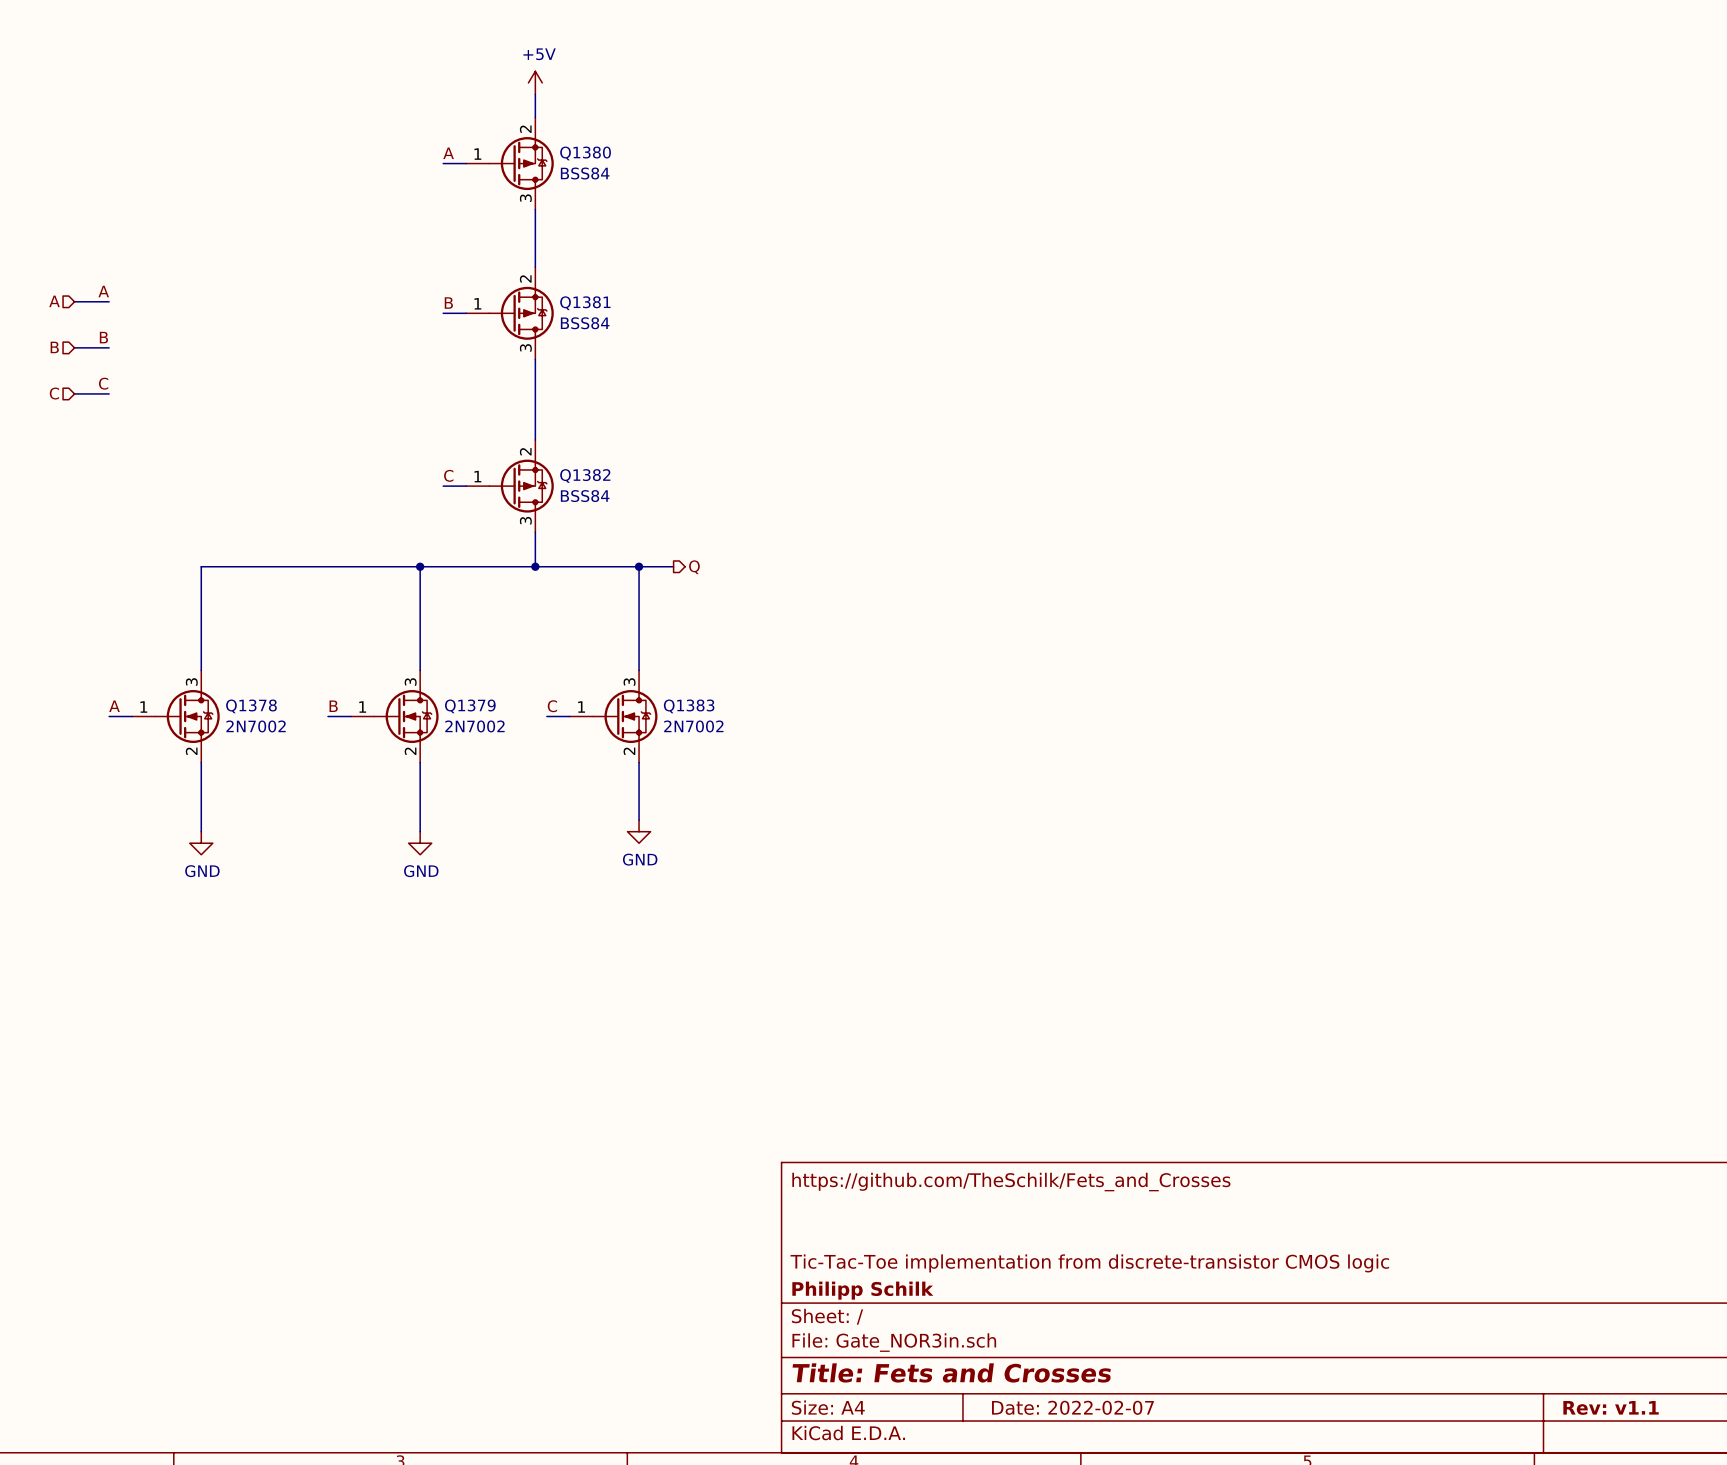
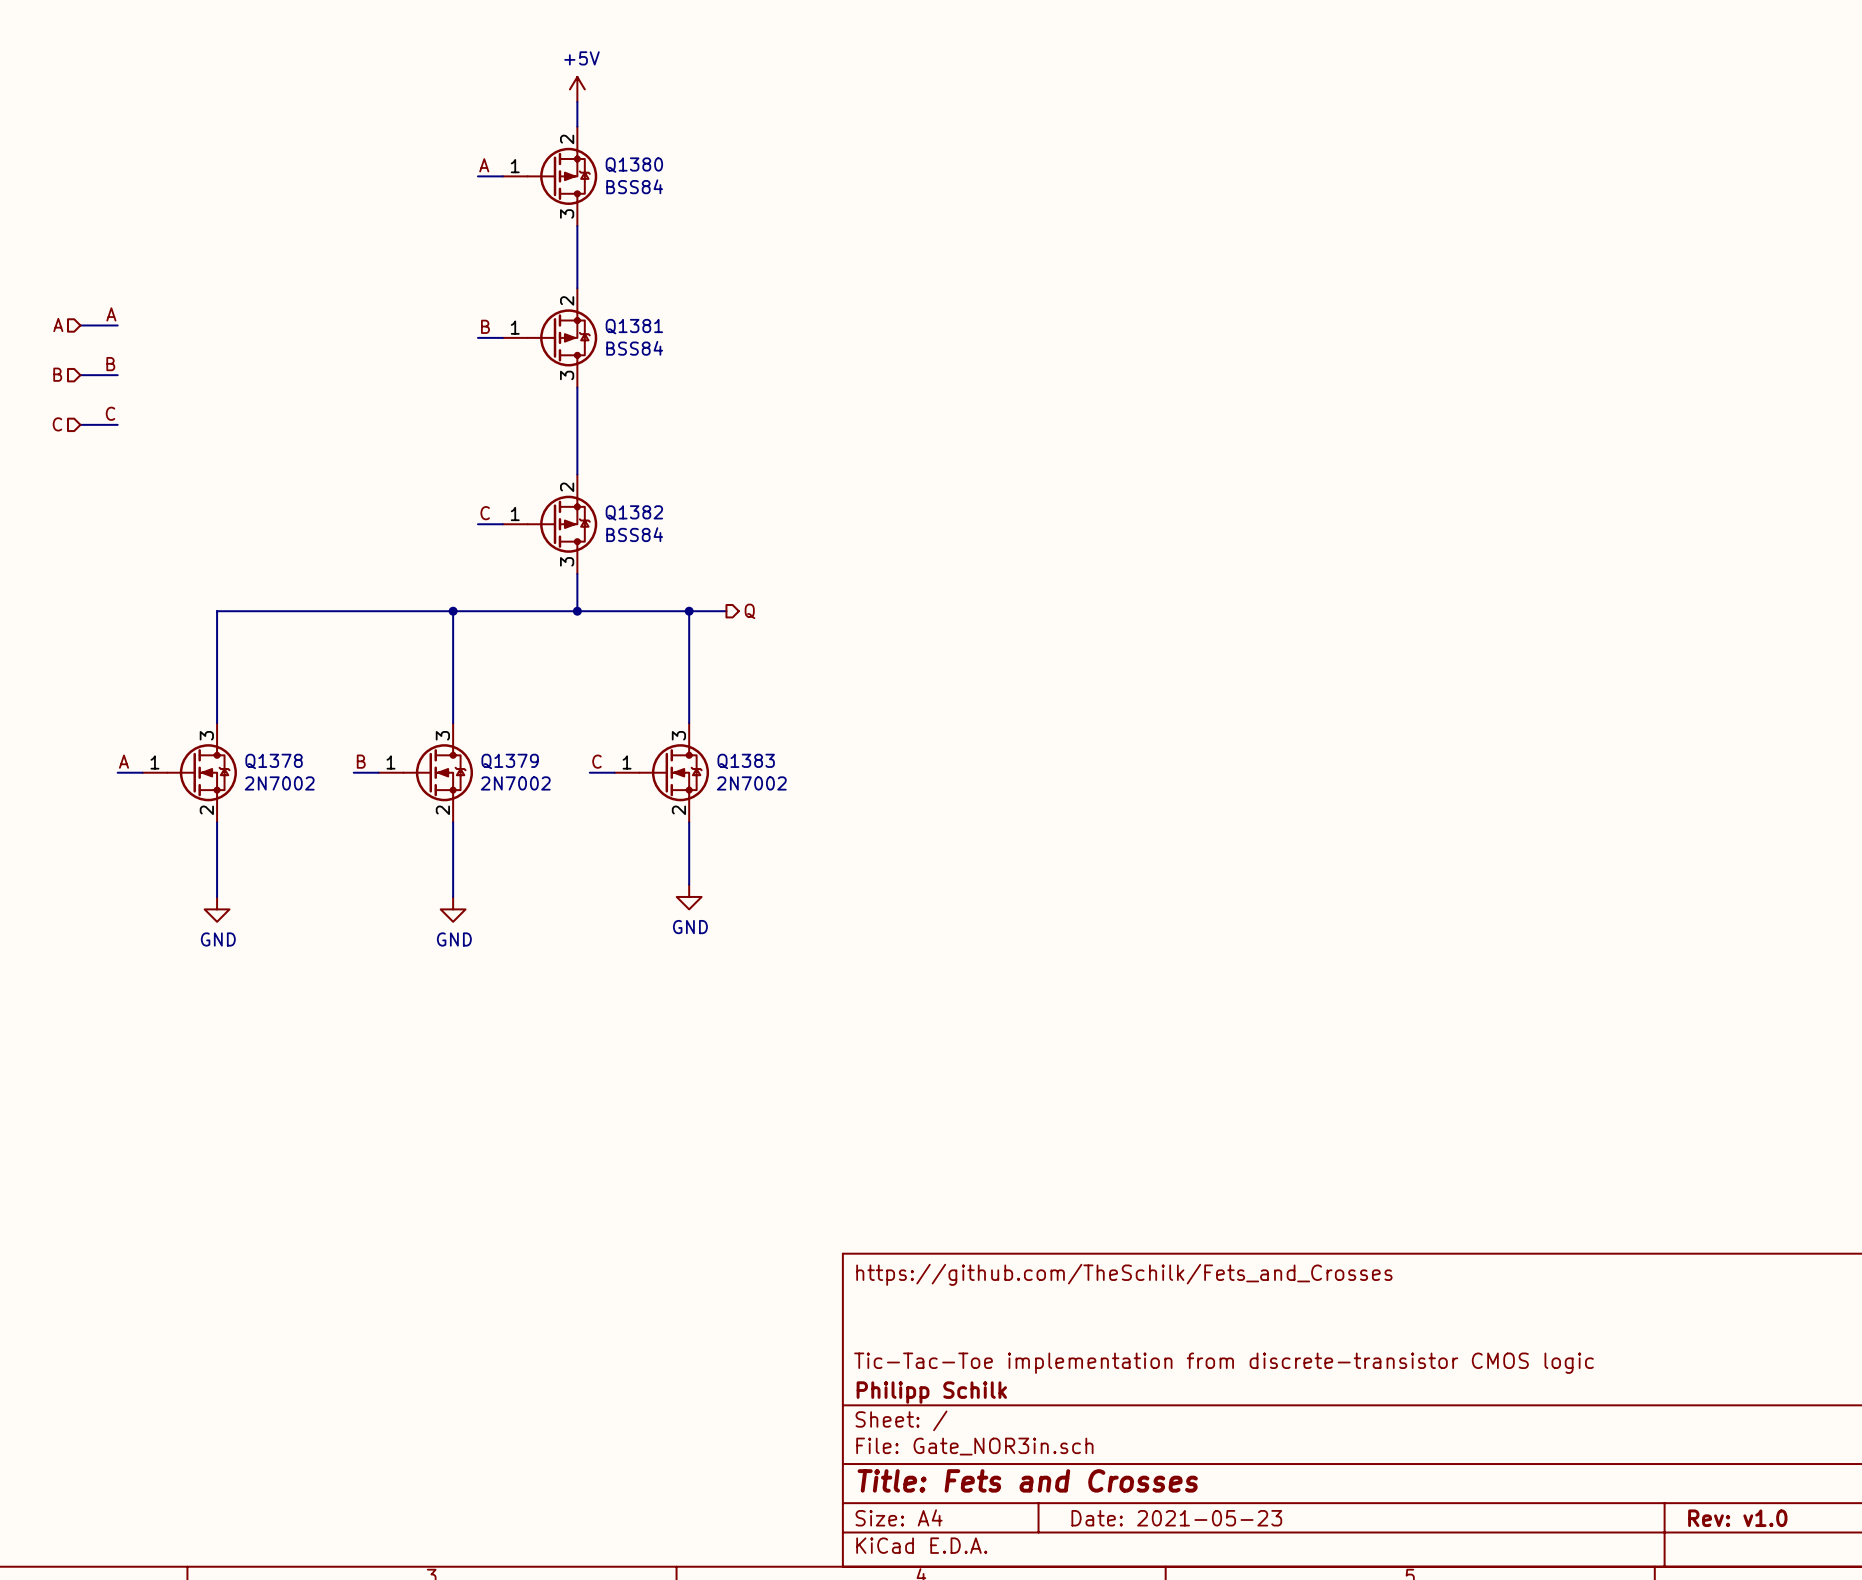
title block: Date: 2022-02-07 (1072, 1407) -> Date: 2021-05-23 (1176, 1518)
title block: Rev: v1.1 (1611, 1407) -> Rev: v1.0 (1737, 1518)

